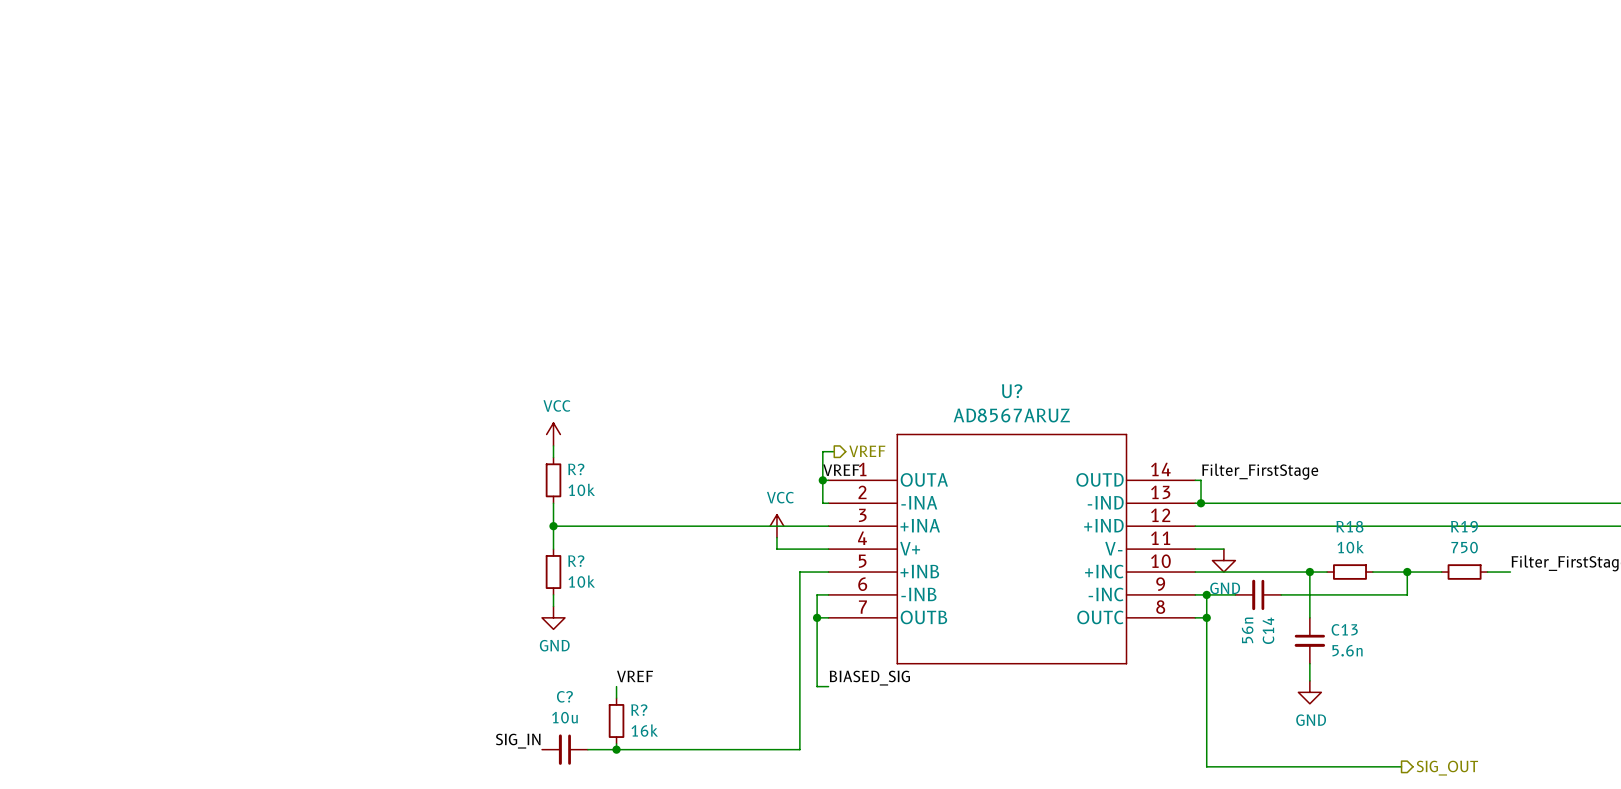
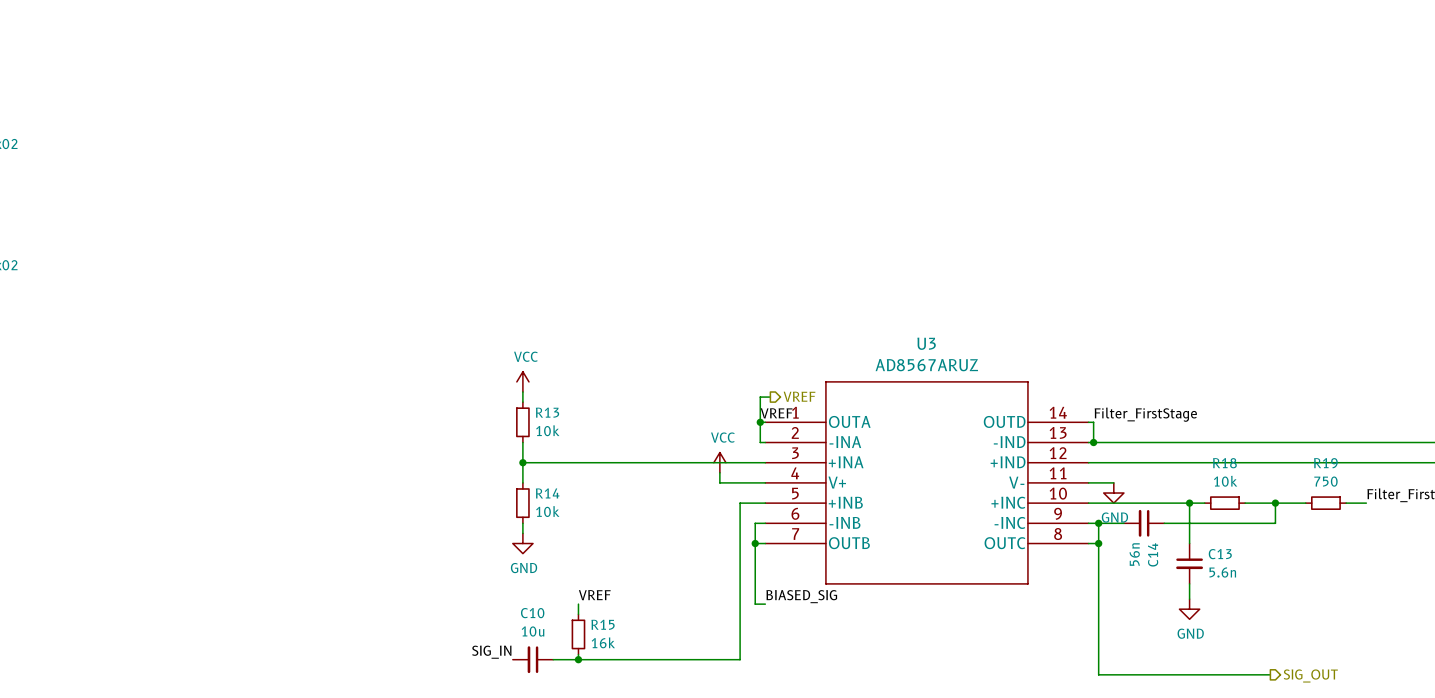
U? name: U? (1012, 391) -> U3 (926, 343)
R? name: R? (576, 469) -> R13 (547, 412)
R? name: R? (576, 561) -> R14 (547, 493)
C? name: C? (564, 696) -> C10 (532, 613)
R? name: R? (639, 710) -> R15 (603, 624)

